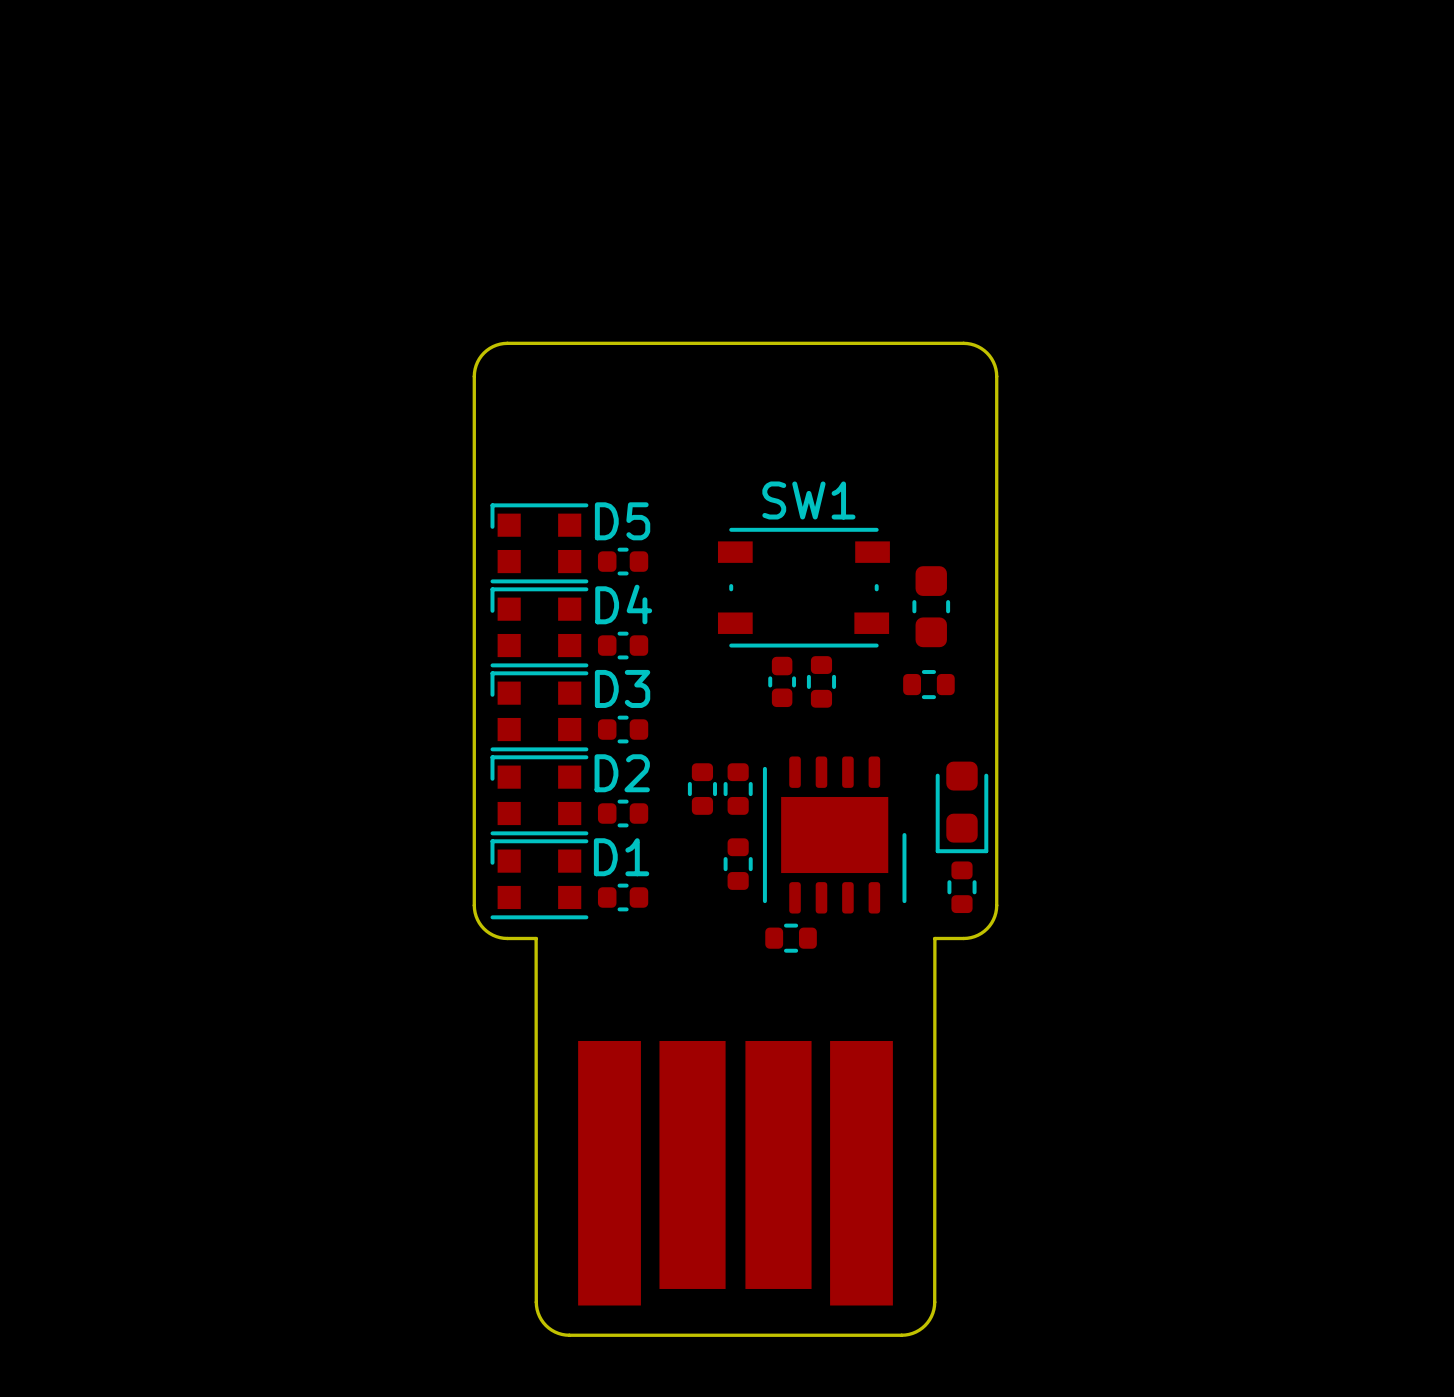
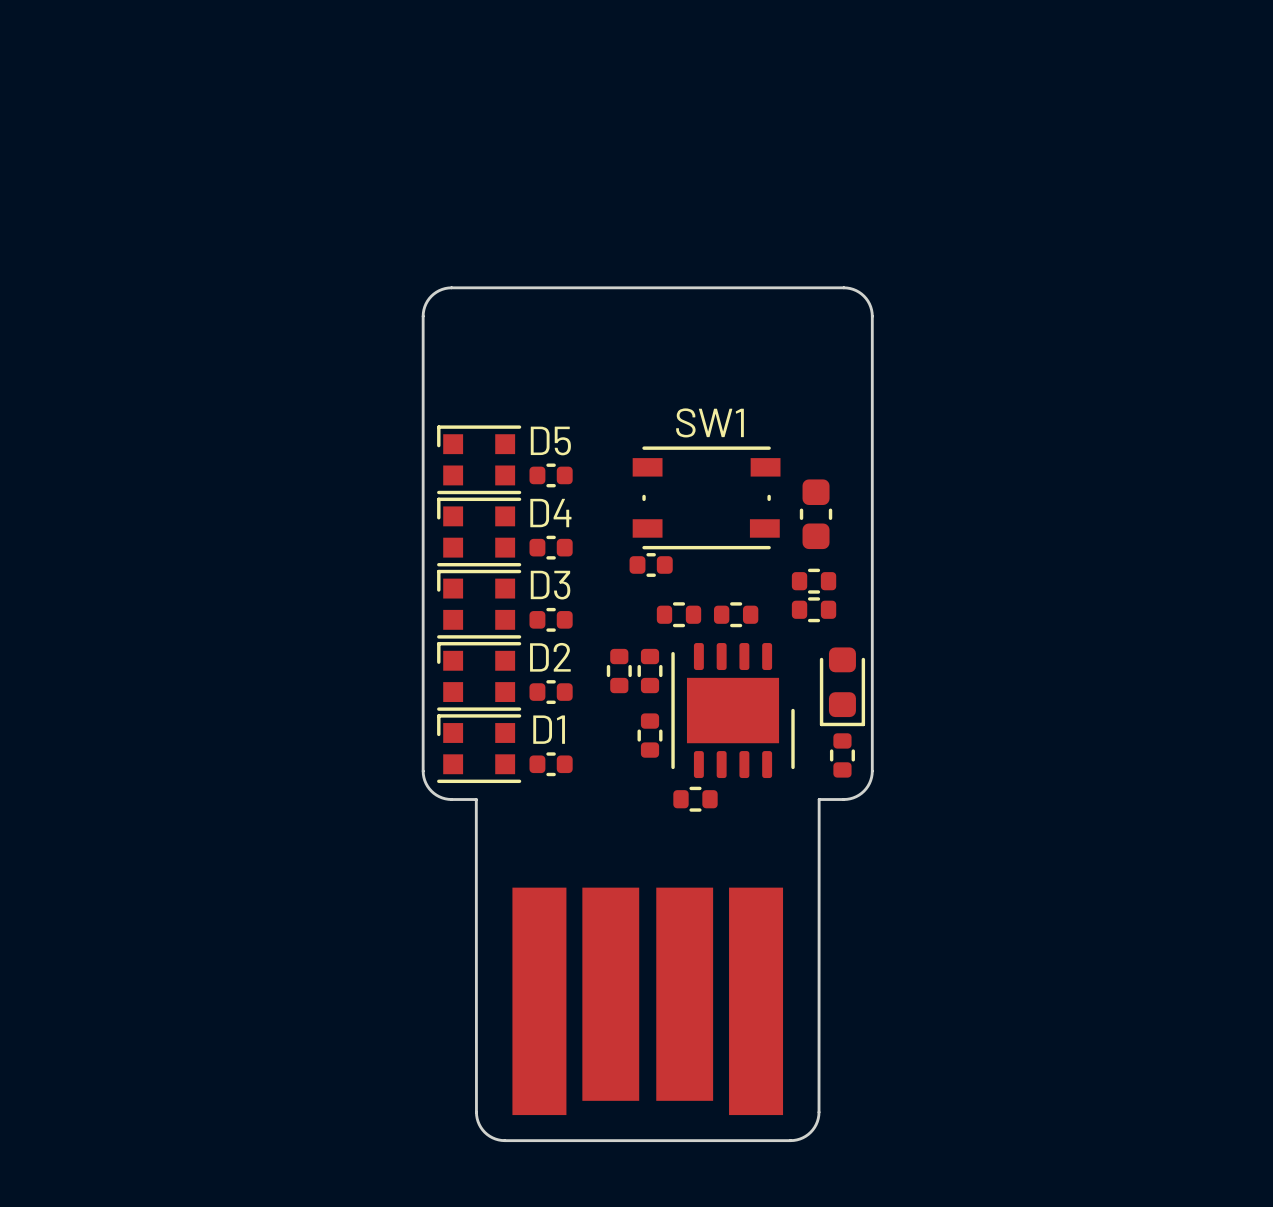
part rotation: 0° (782, 681) -> 90° clockwise (651, 564)
part position: (782, 681) -> (651, 564)
part: (821, 681) -> none
part: none -> (814, 609)
part: none -> (679, 614)
part: none -> (736, 614)

